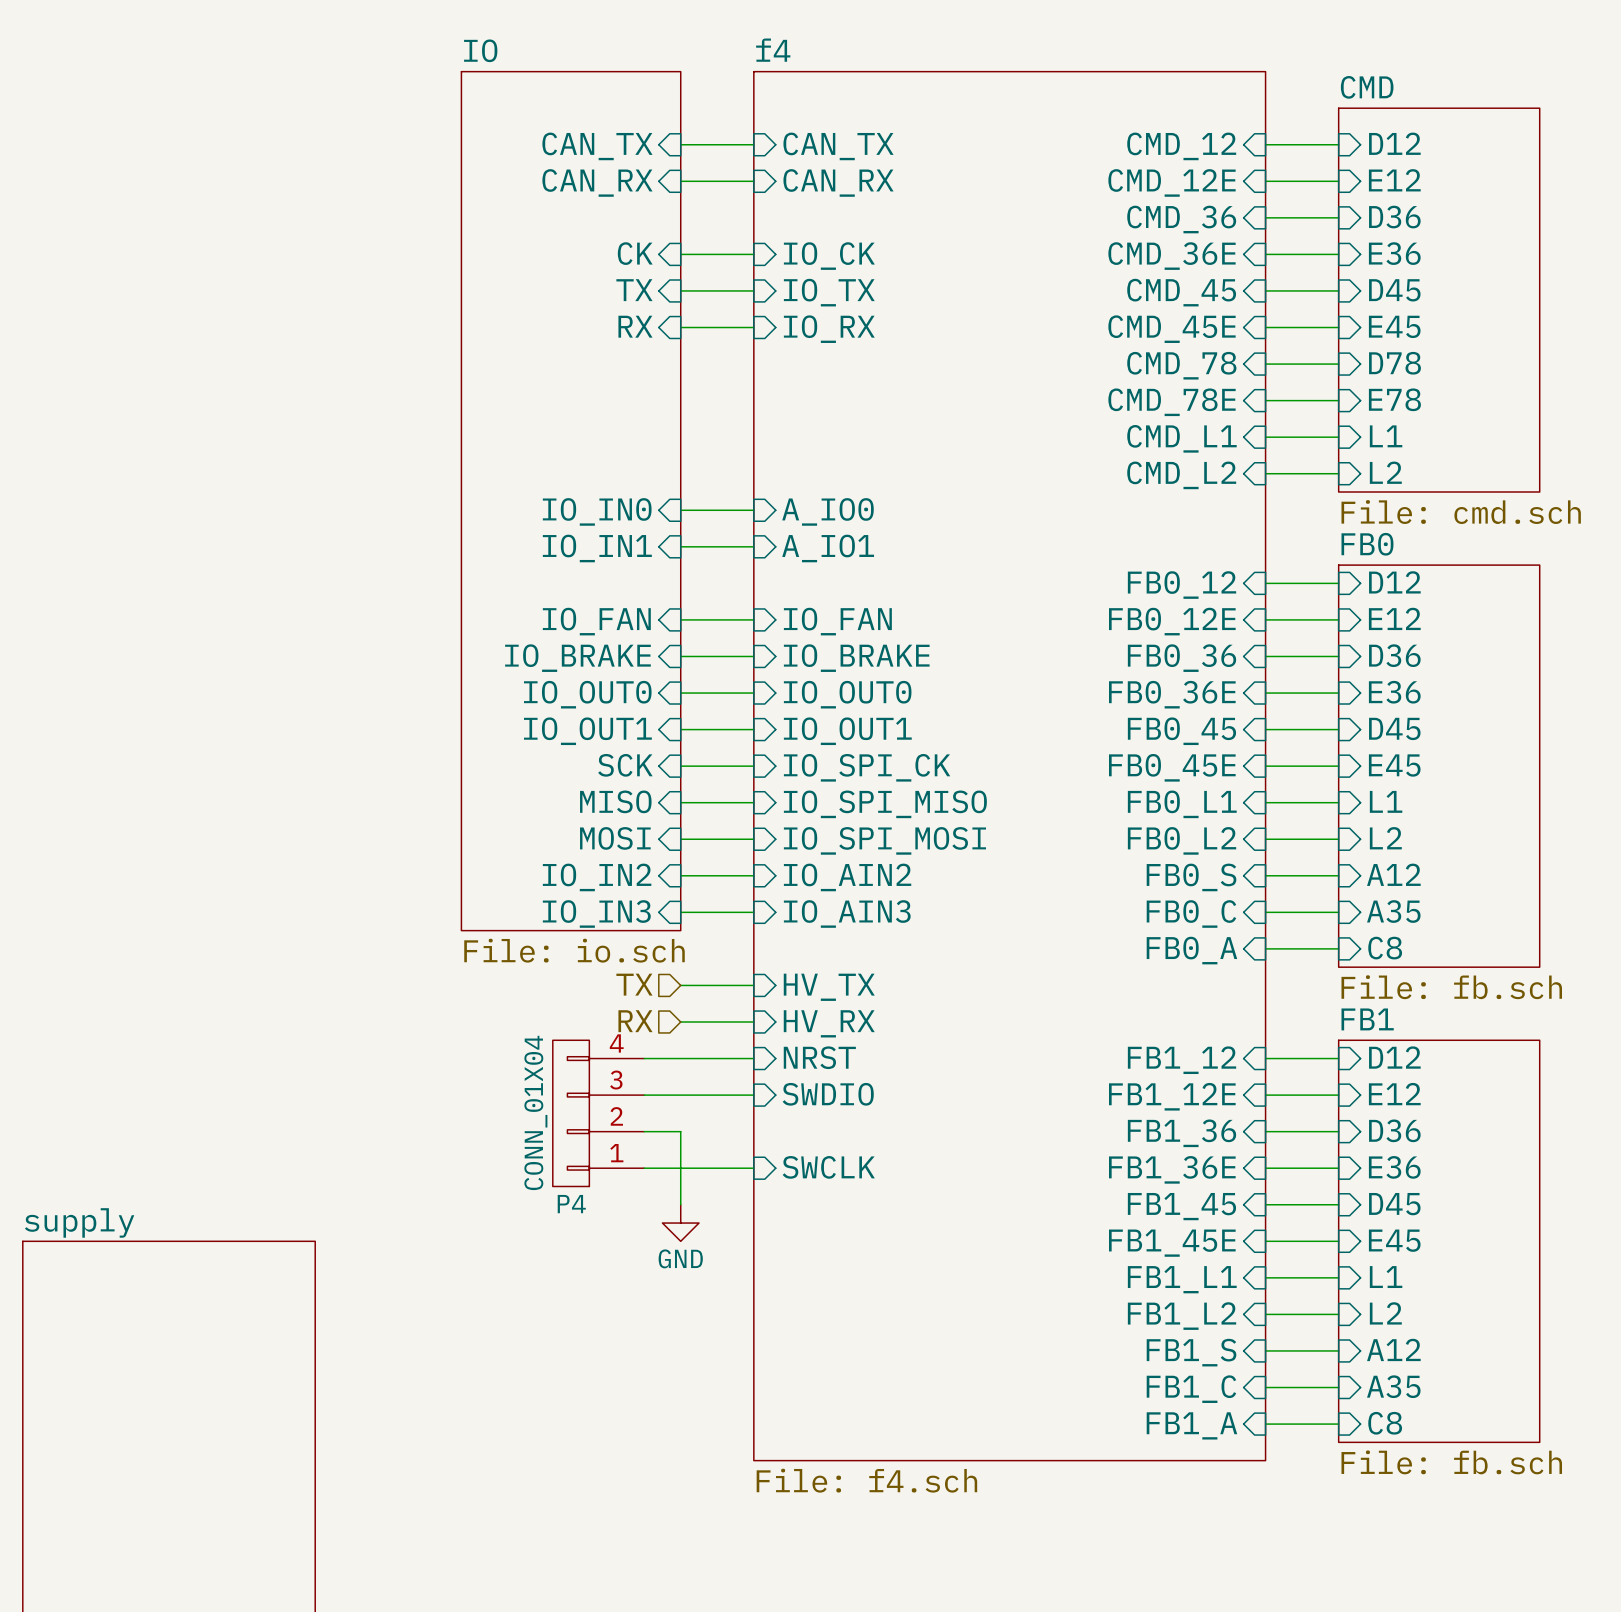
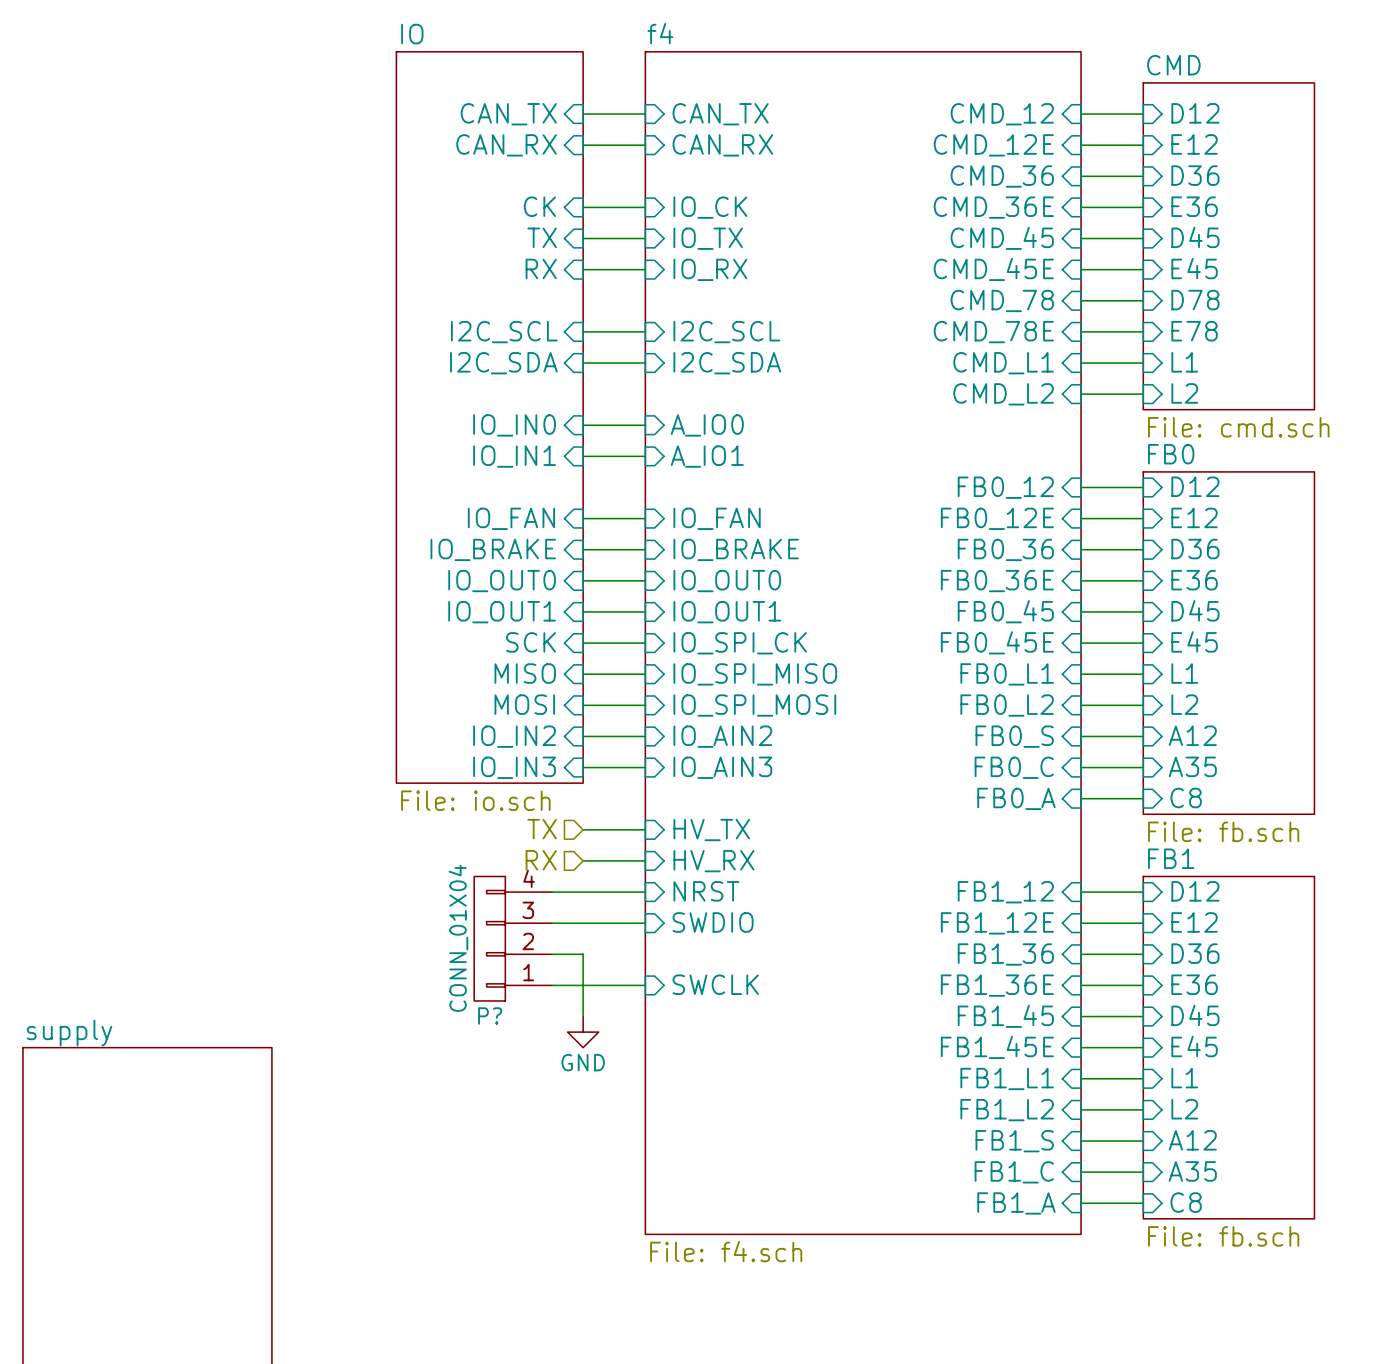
wire: none -> (583, 331) (645, 331)
sheet pin: none -> I2C_SCL (504, 332)
sheet pin: none -> I2C_SCL (726, 332)
wire: none -> (583, 363) (645, 363)
sheet pin: none -> I2C_SDA (503, 363)
sheet pin: none -> I2C_SDA (727, 363)
P4 name: P4 (571, 1204) -> P? (490, 1015)

